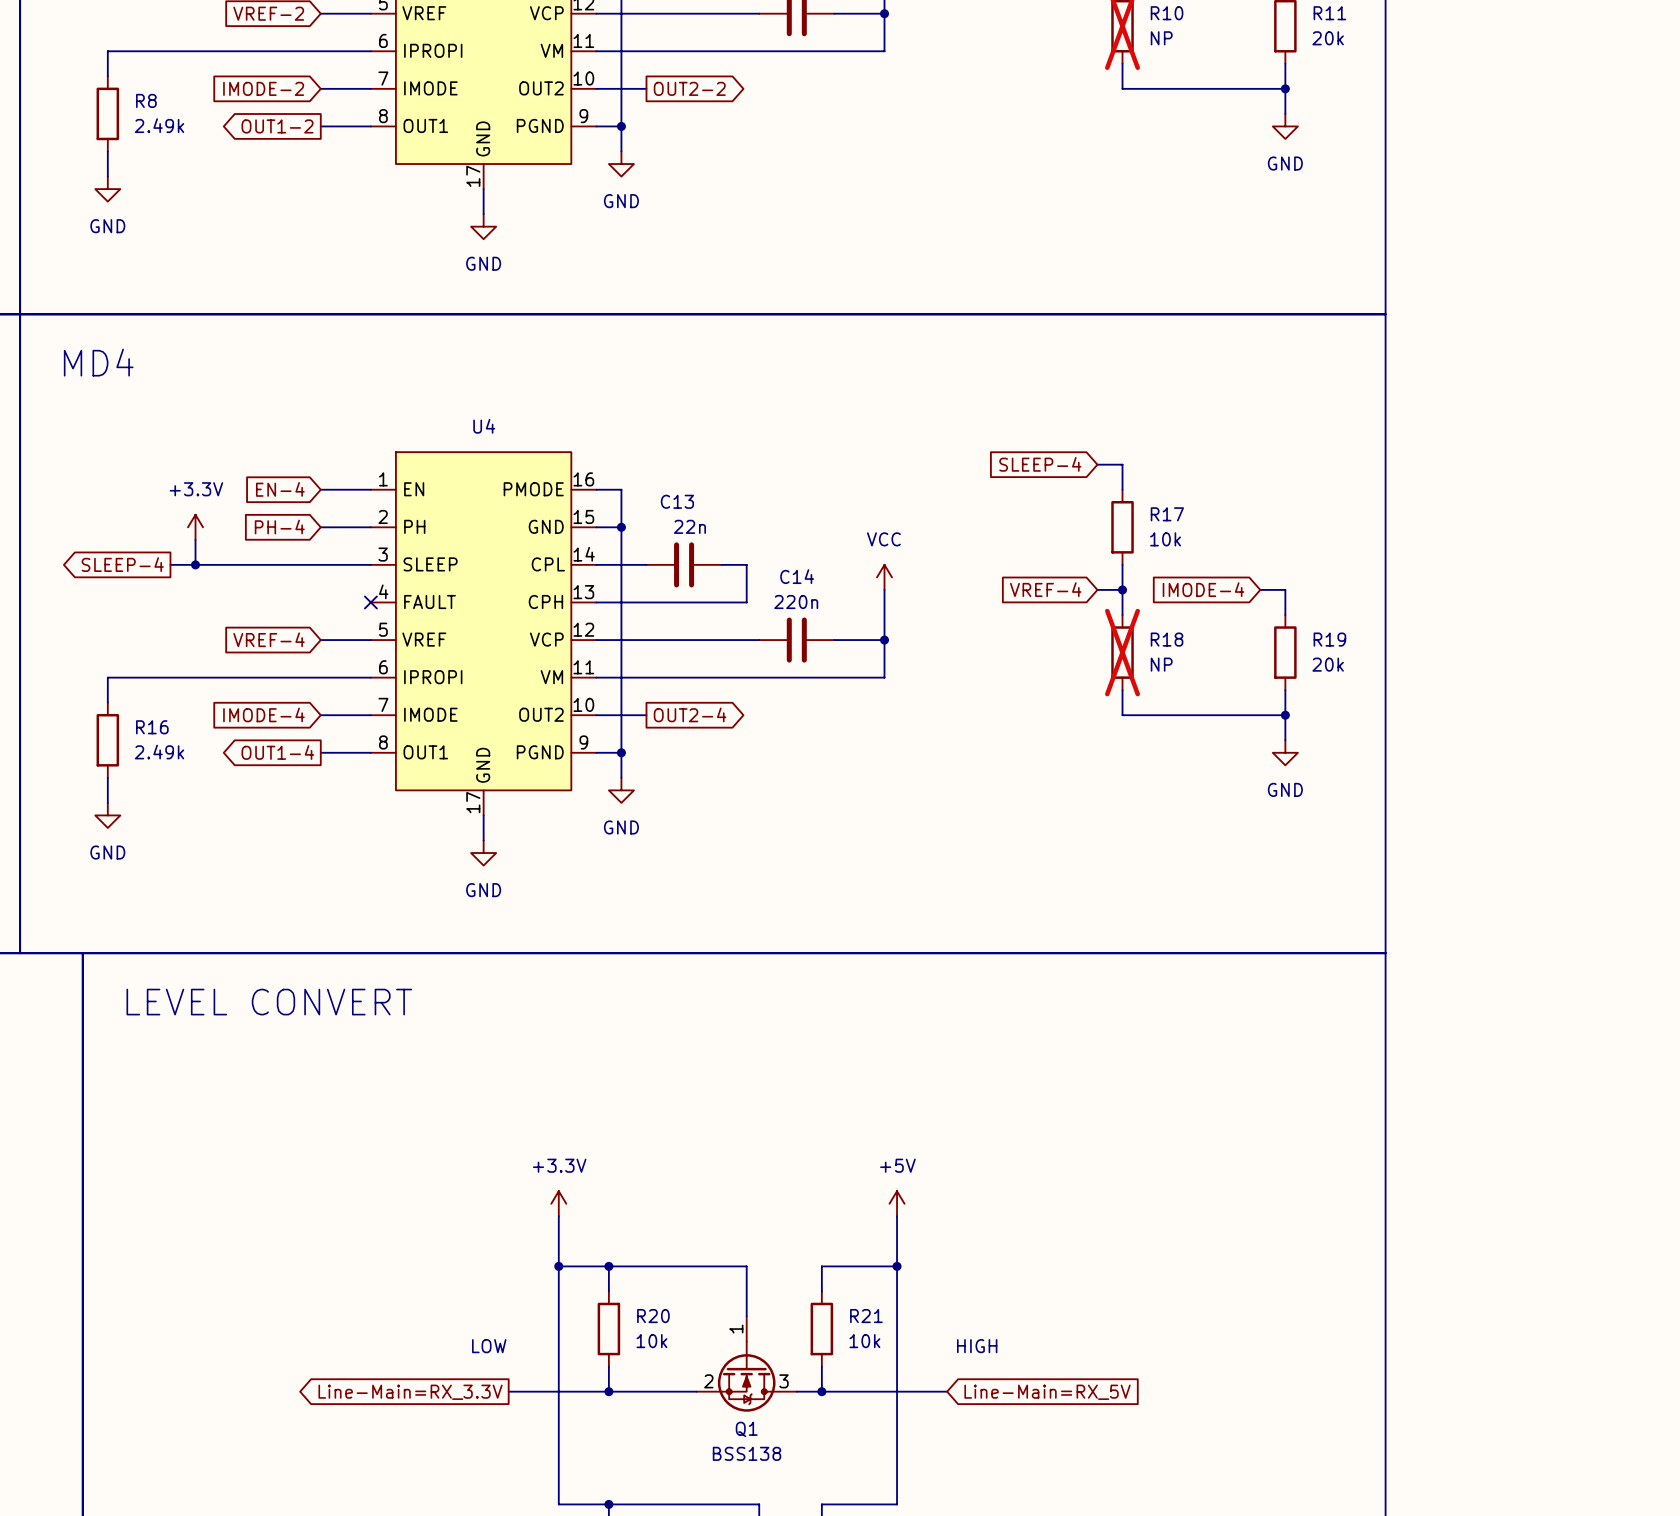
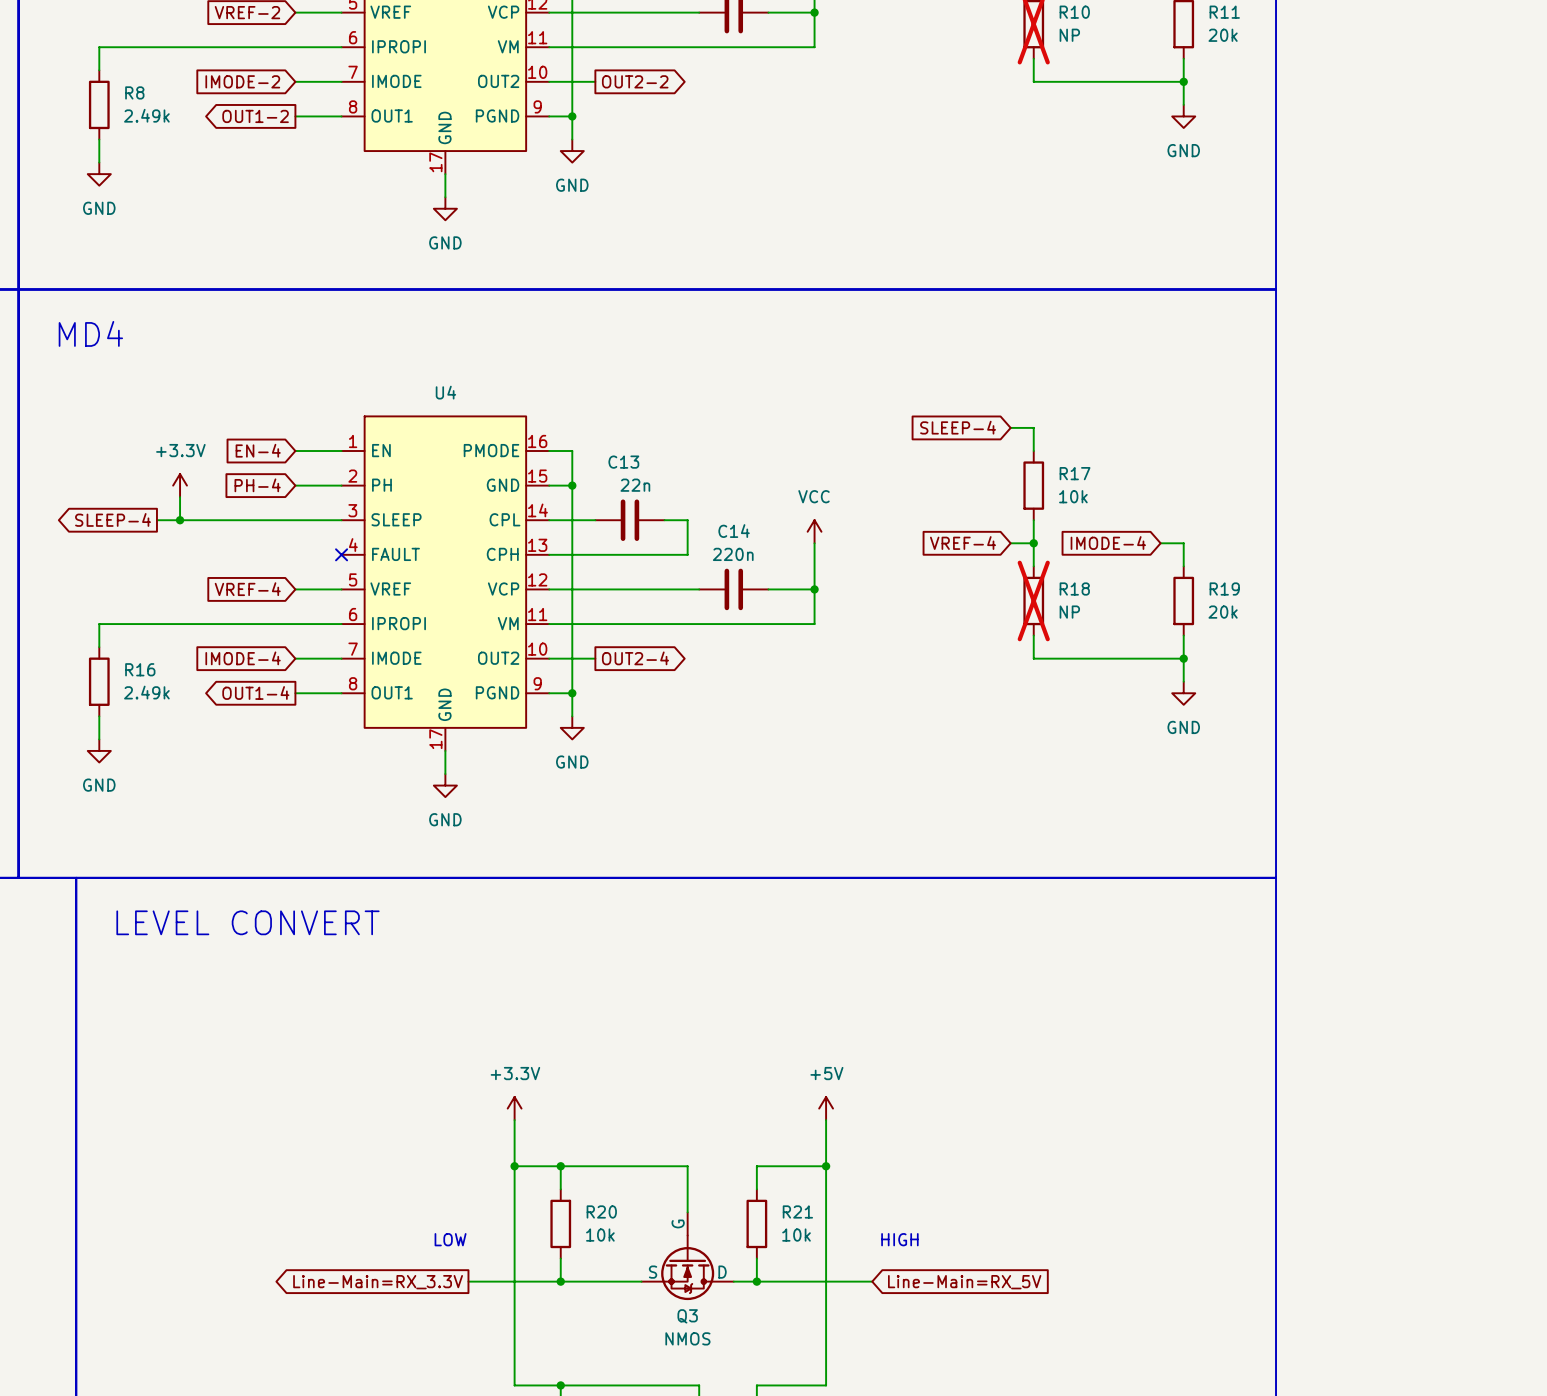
Q1 pin name: none -> G (678, 1223)
Q1 pin number: 1 (736, 1329) -> none
Q1 pin number: 2 (708, 1381) -> none
Q1 pin name: none -> S (653, 1272)
Q1 pin number: 3 (783, 1381) -> none
Q1 pin name: none -> D (722, 1272)
Q1 name: Q1 (746, 1429) -> Q3 (687, 1316)
Q1 value: BSS138 (747, 1453) -> NMOS (687, 1338)

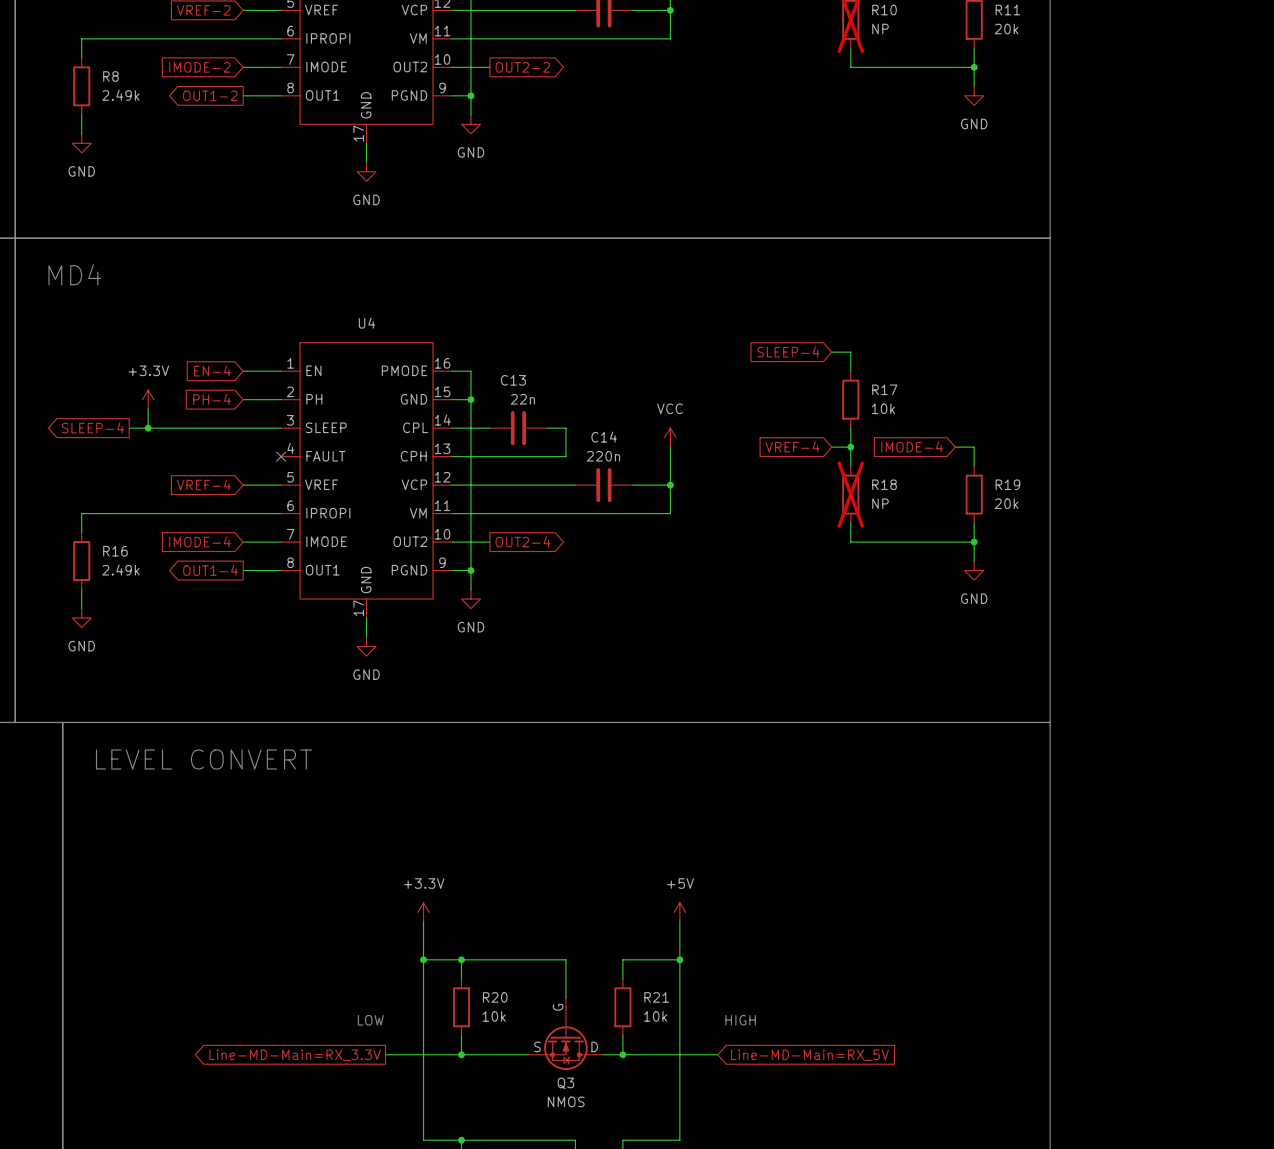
global label: Line-Main=RX_3.3V (378, 1282) -> Line-MD-Main=RX_3.3V (295, 1055)
global label: Line-Main=RX_5V (964, 1282) -> Line-MD-Main=RX_5V (809, 1055)

